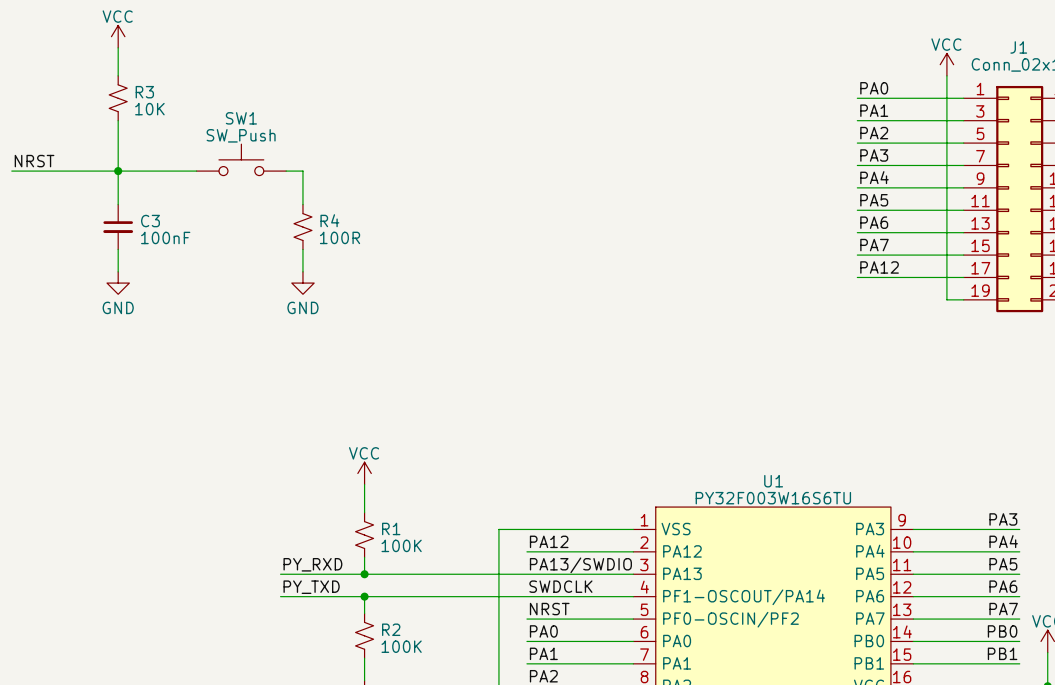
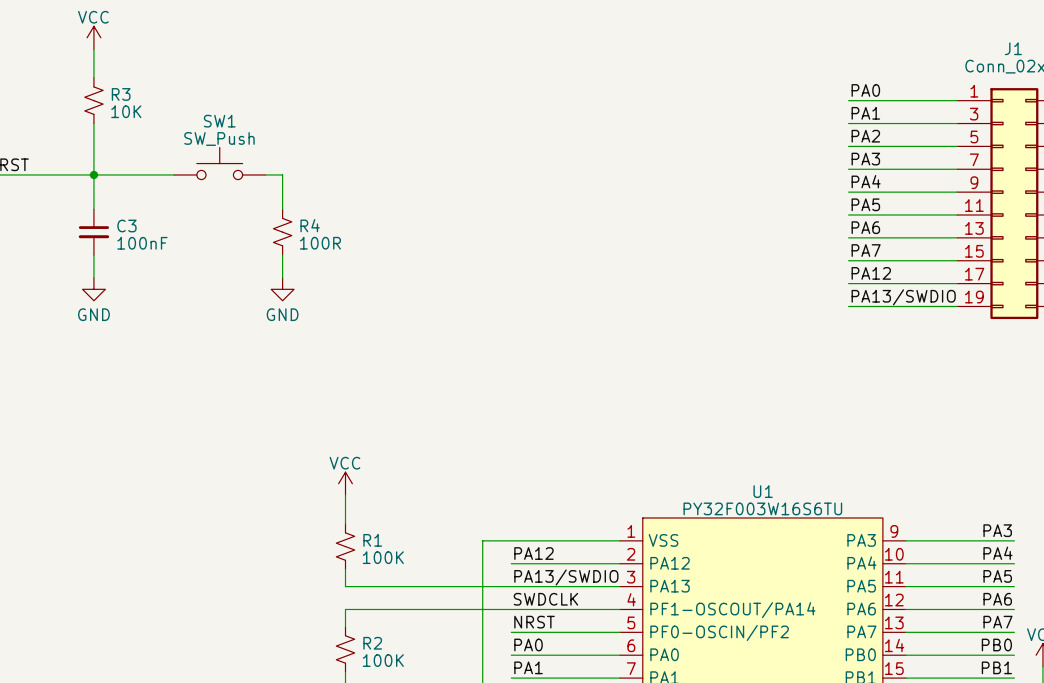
power symbol: VCC (946, 64) -> none
wire: (946, 75) (946, 299) -> (848, 306) (940, 306)
label: none -> PA13/SWDIO (903, 297)
label: PY_RXD (312, 564) -> none
wire: (280, 574) (364, 574) -> none
junction: (364, 574) -> none
label: PY_TXD (311, 587) -> none
wire: (280, 596) (364, 596) -> none
junction: (364, 596) -> none

